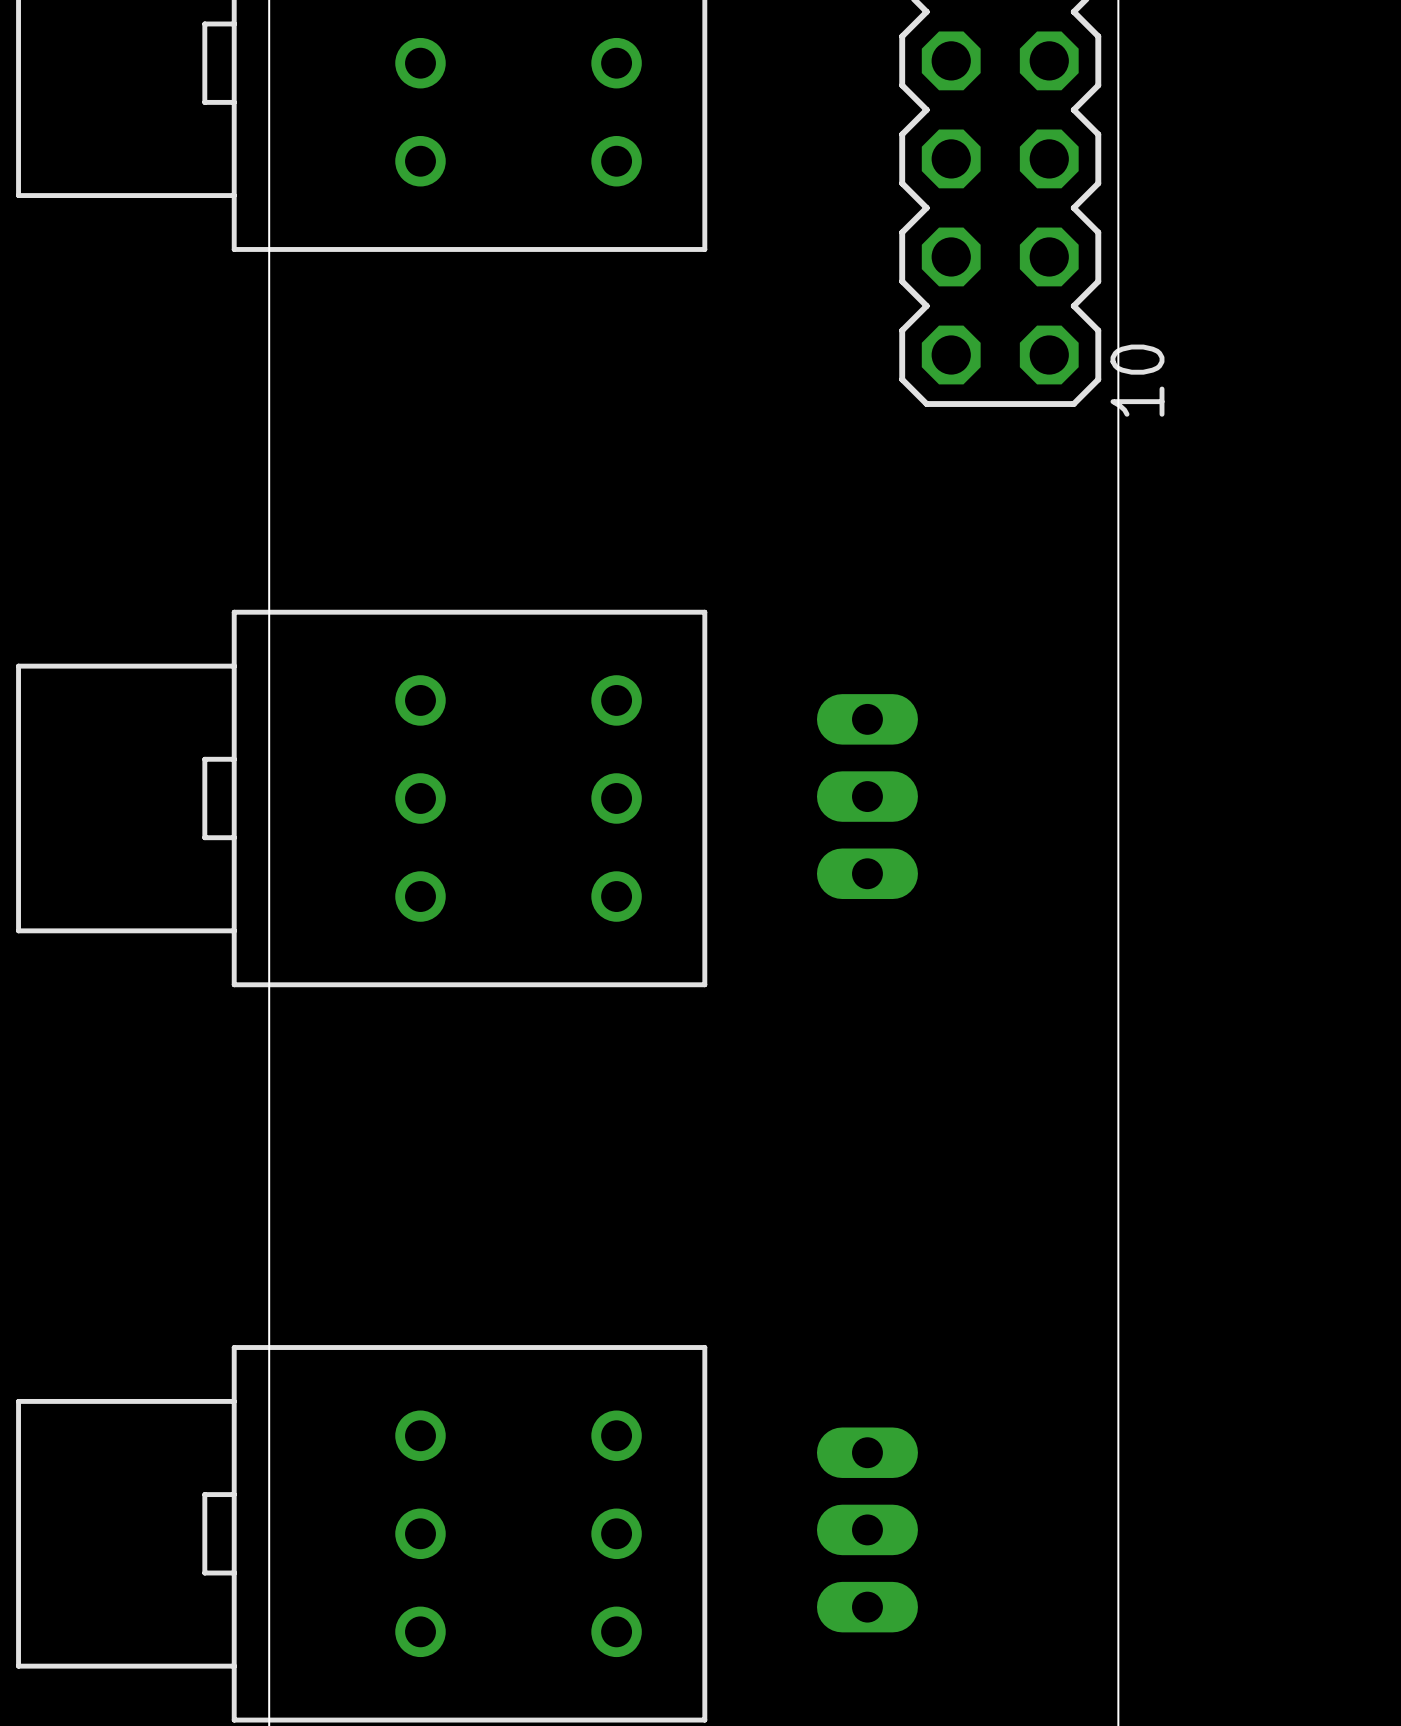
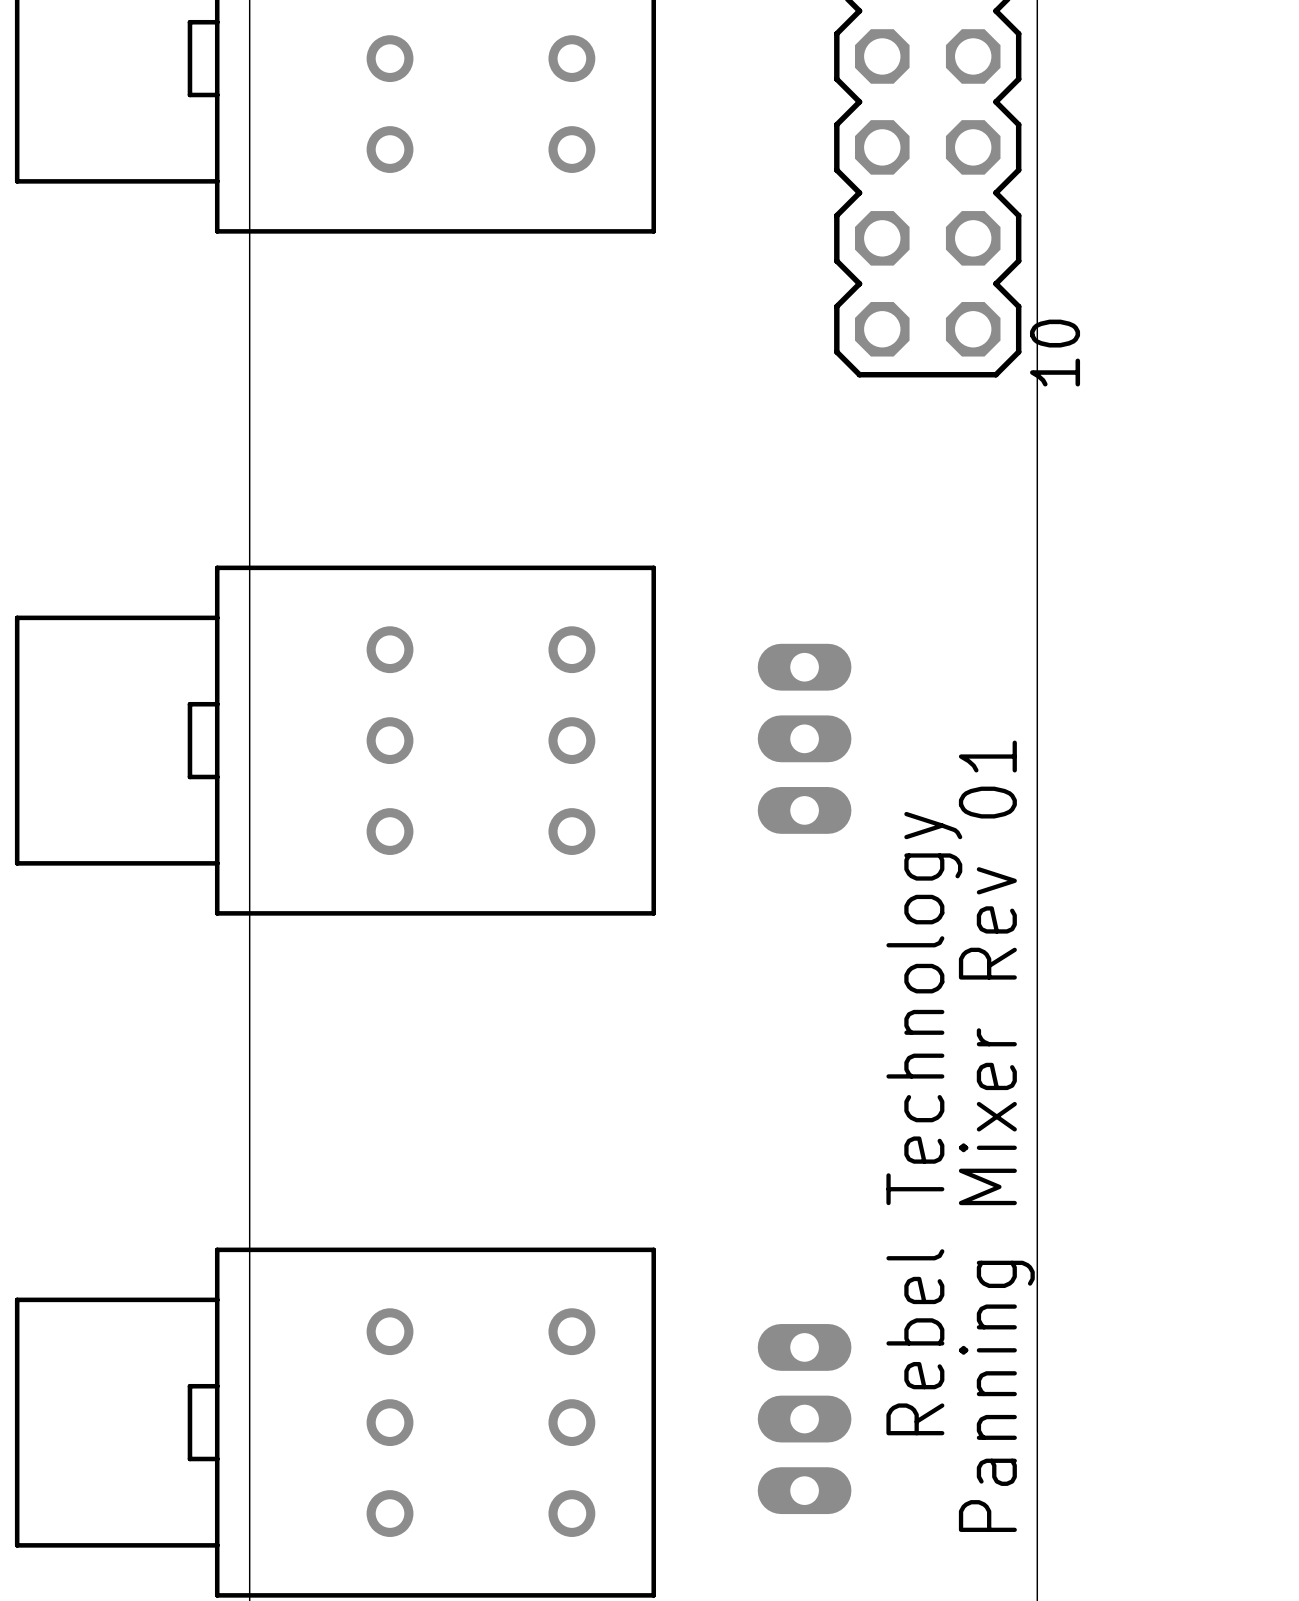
text: none -> Rebel Technology (924, 1123)
text: none -> Panning Mixer Rev 01 (996, 1136)

